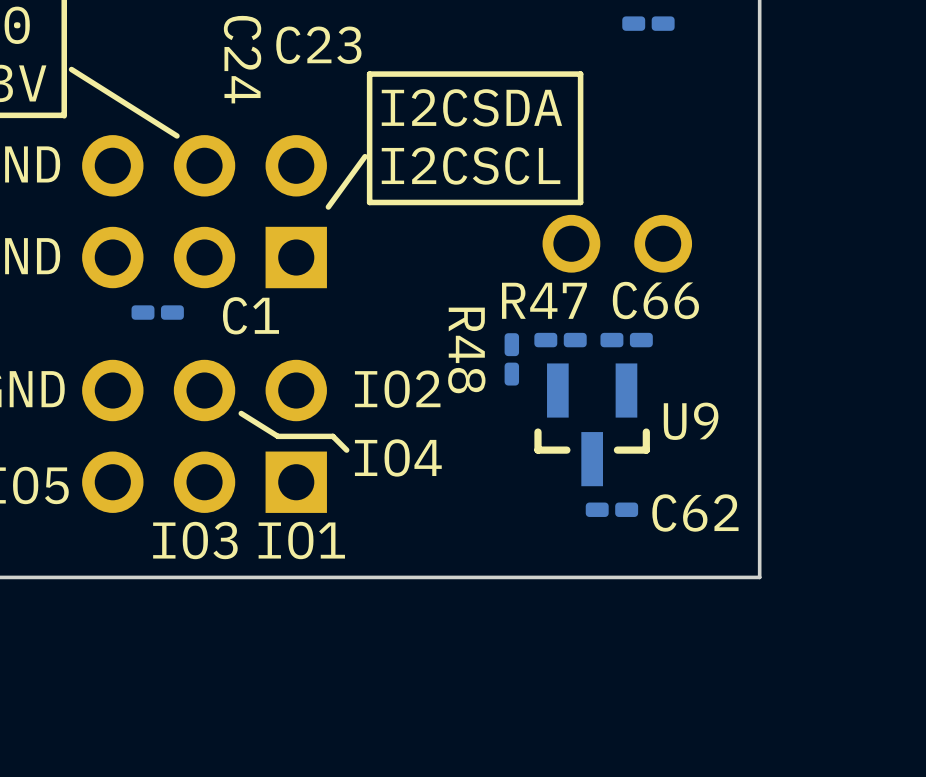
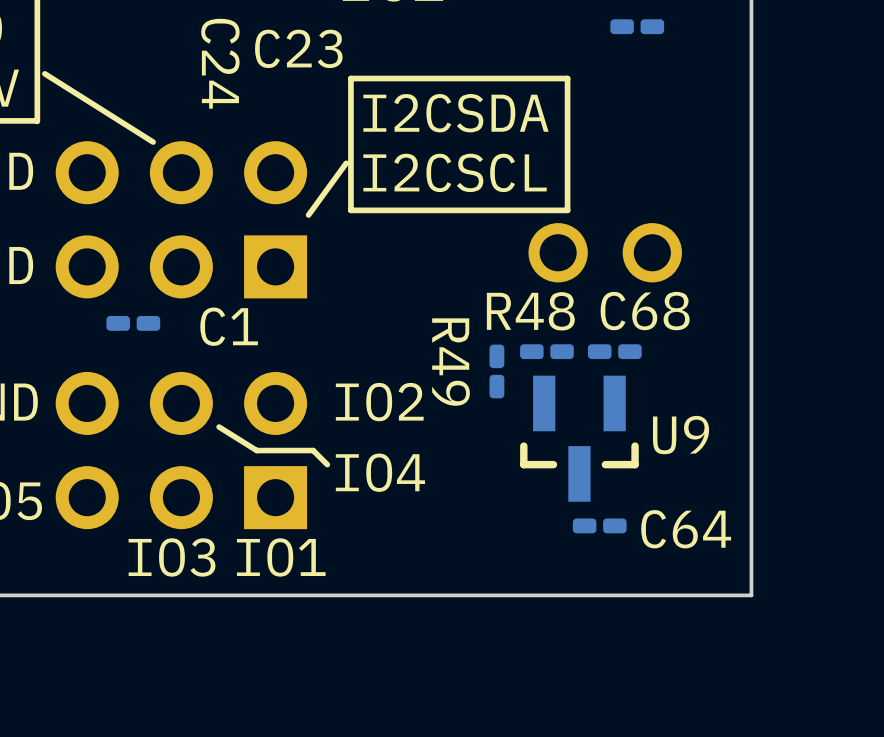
R47 name: R47 (544, 300) -> R48 (530, 311)
C66 name: C66 (655, 300) -> C68 (645, 311)
R48 name: R48 (466, 350) -> R49 (451, 362)
C62 name: C62 (695, 512) -> C64 (686, 529)

